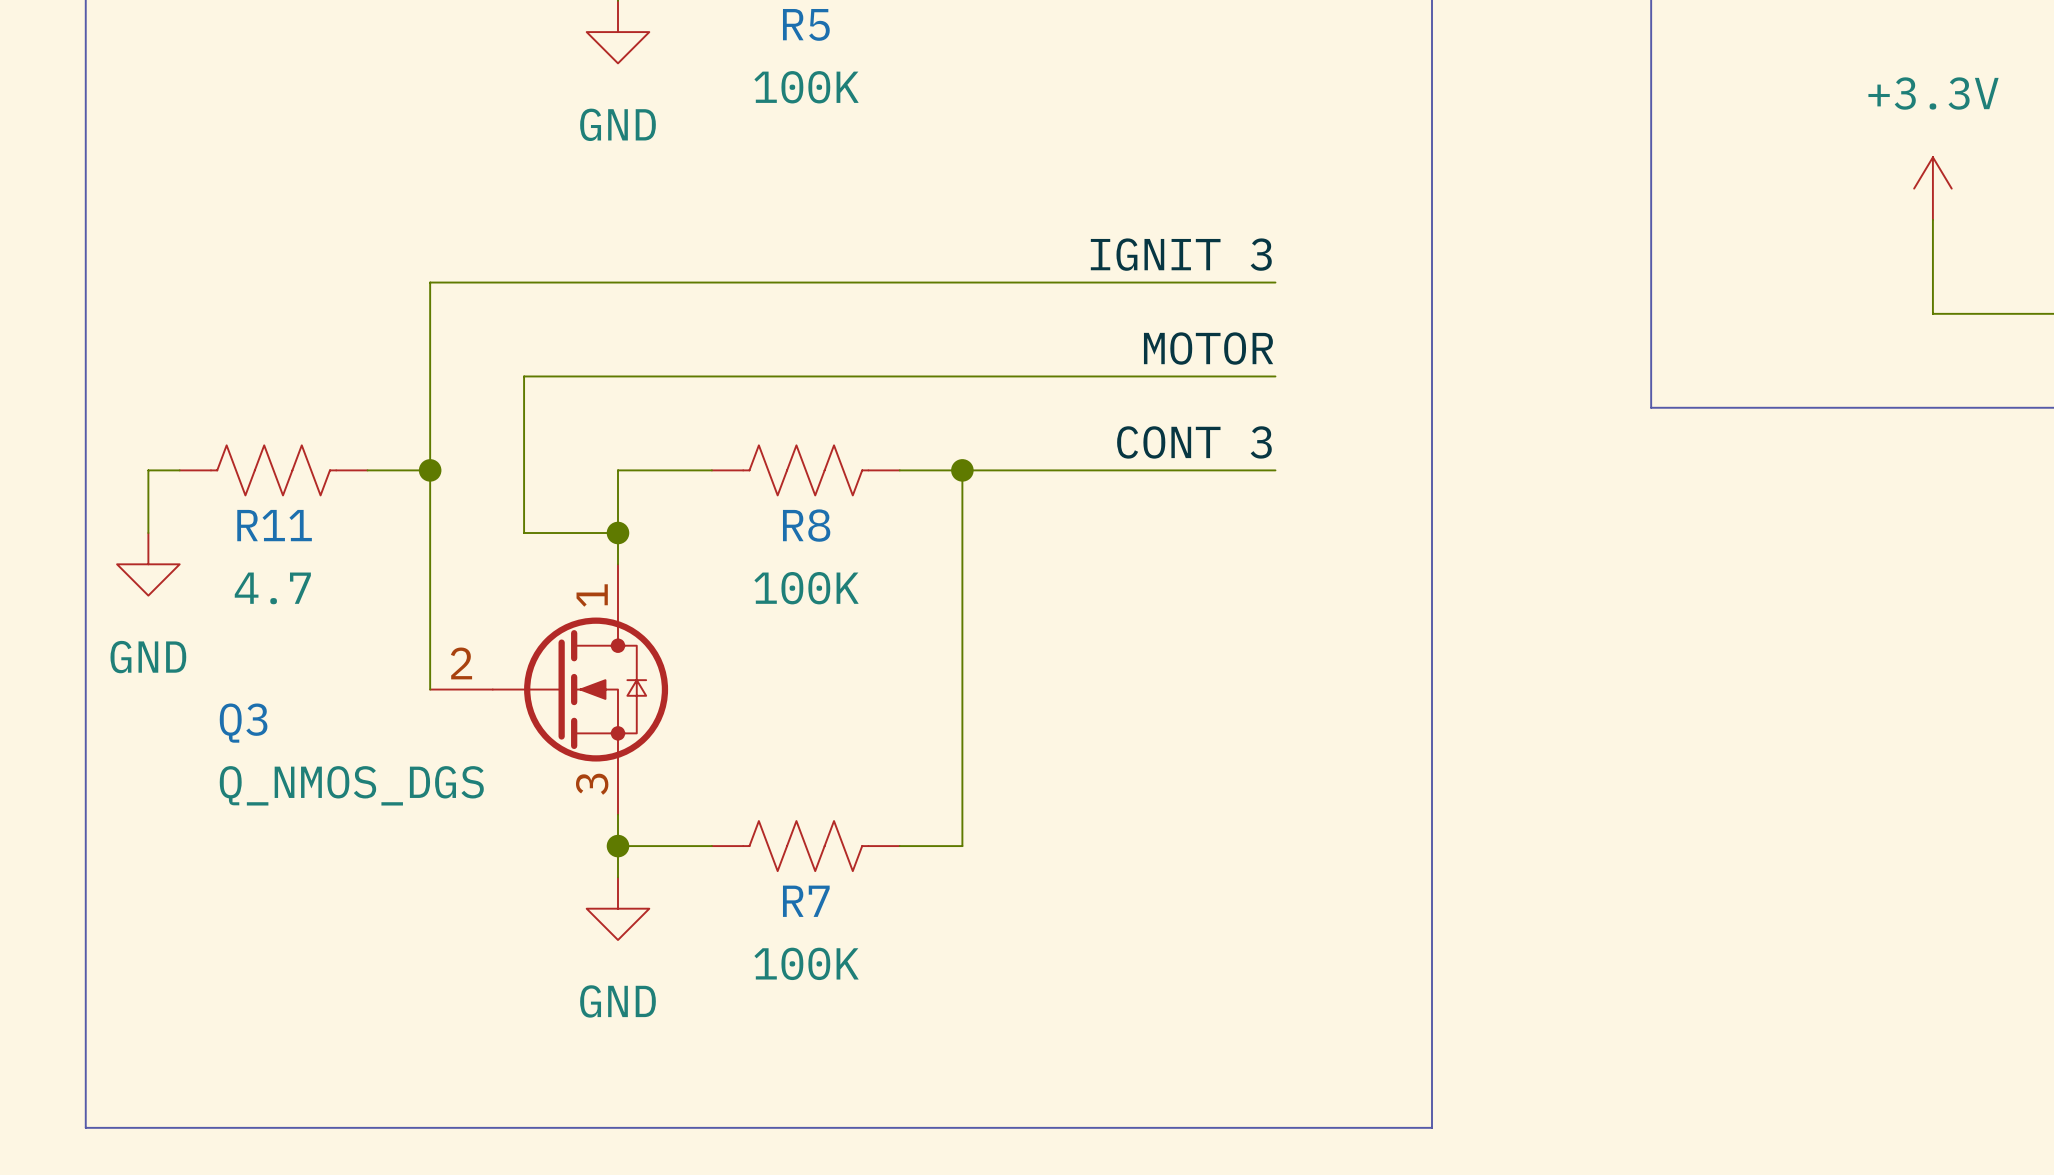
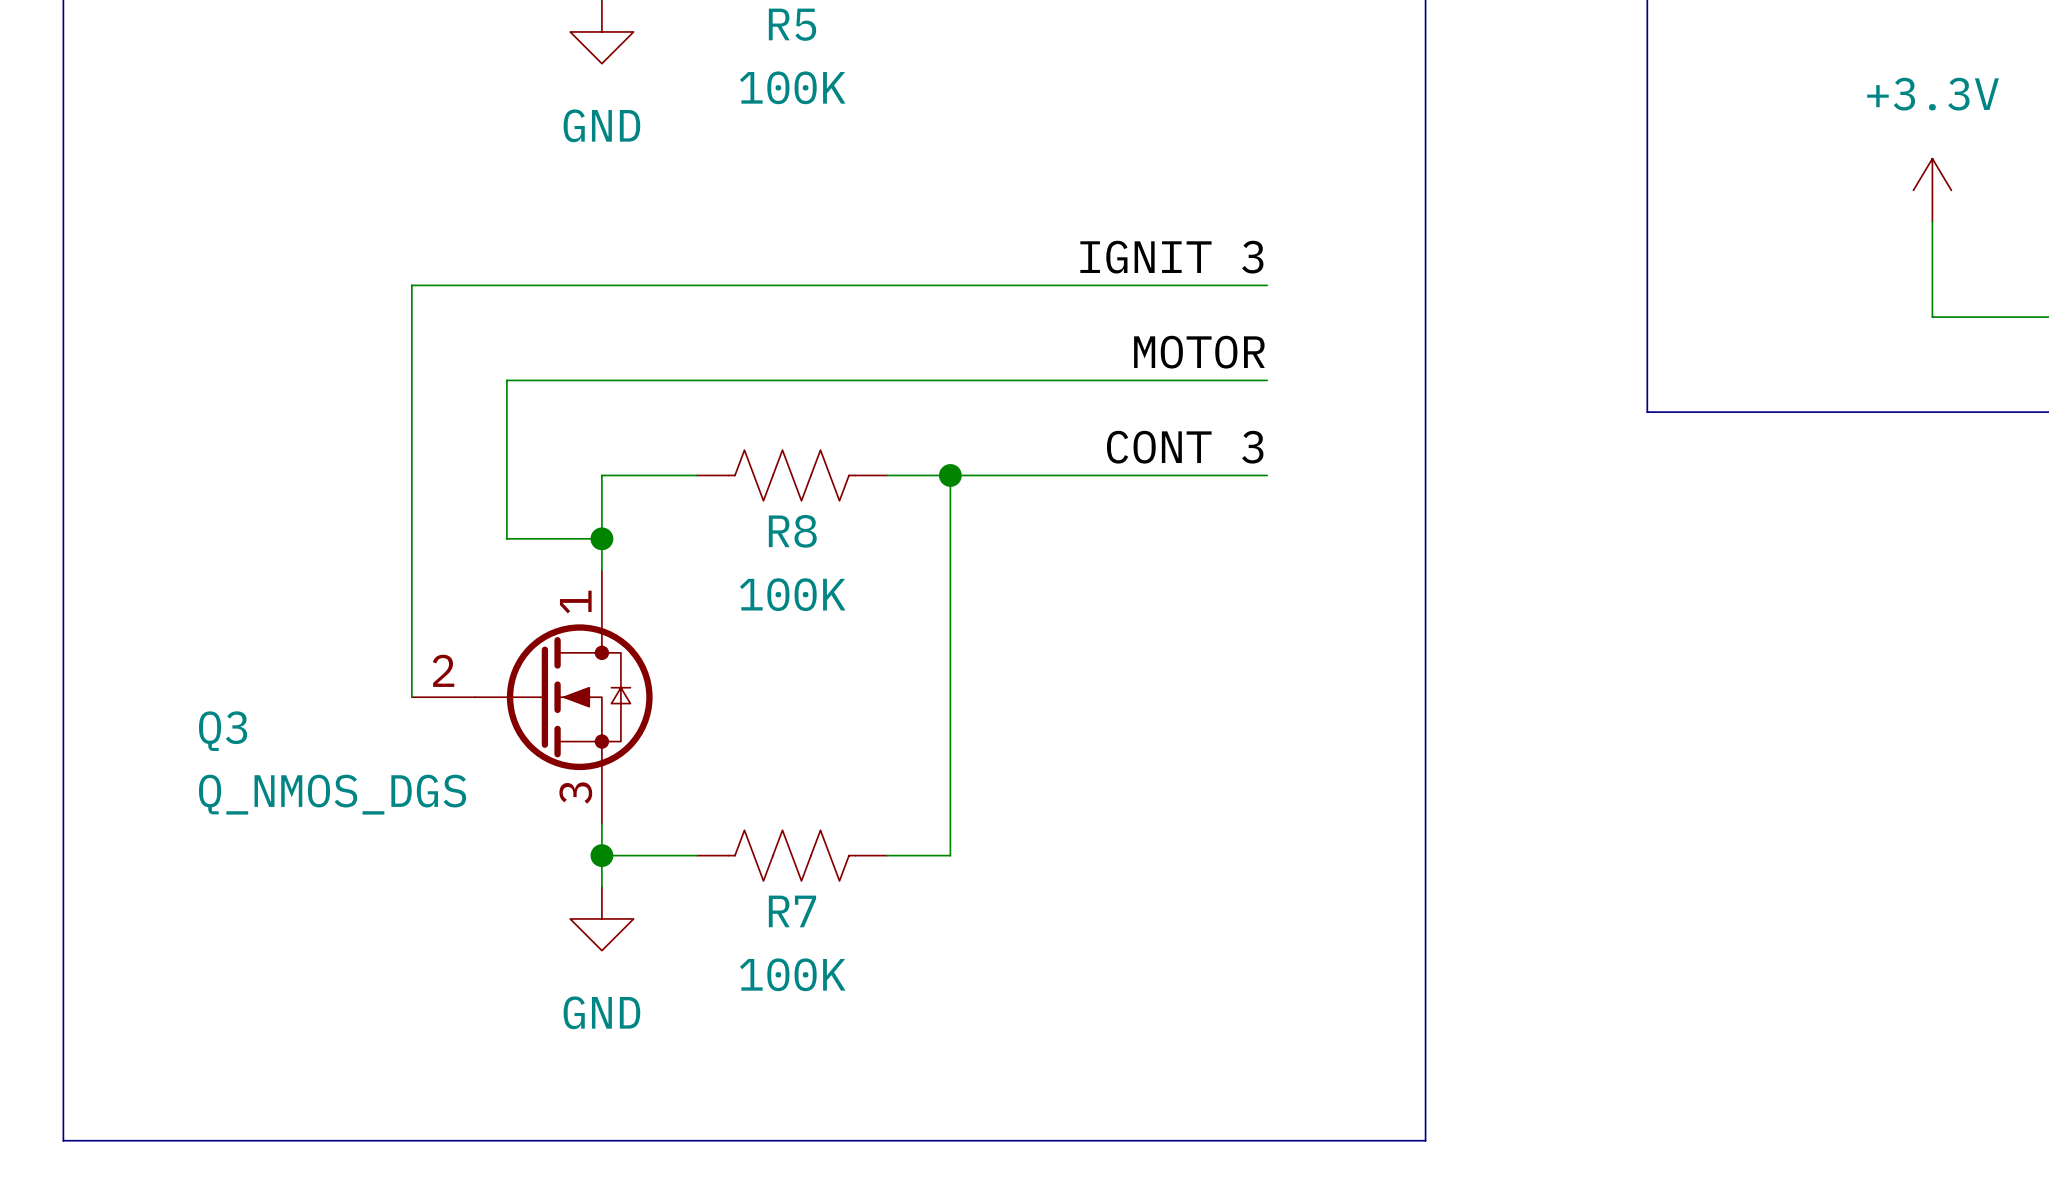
wire: (179, 470) (148, 470) (148, 533) -> none
R11: 4.7 (273, 470) -> none
wire: (367, 470) (430, 470) -> none
junction: (430, 470) -> none
power symbol: GND (148, 564) -> none

